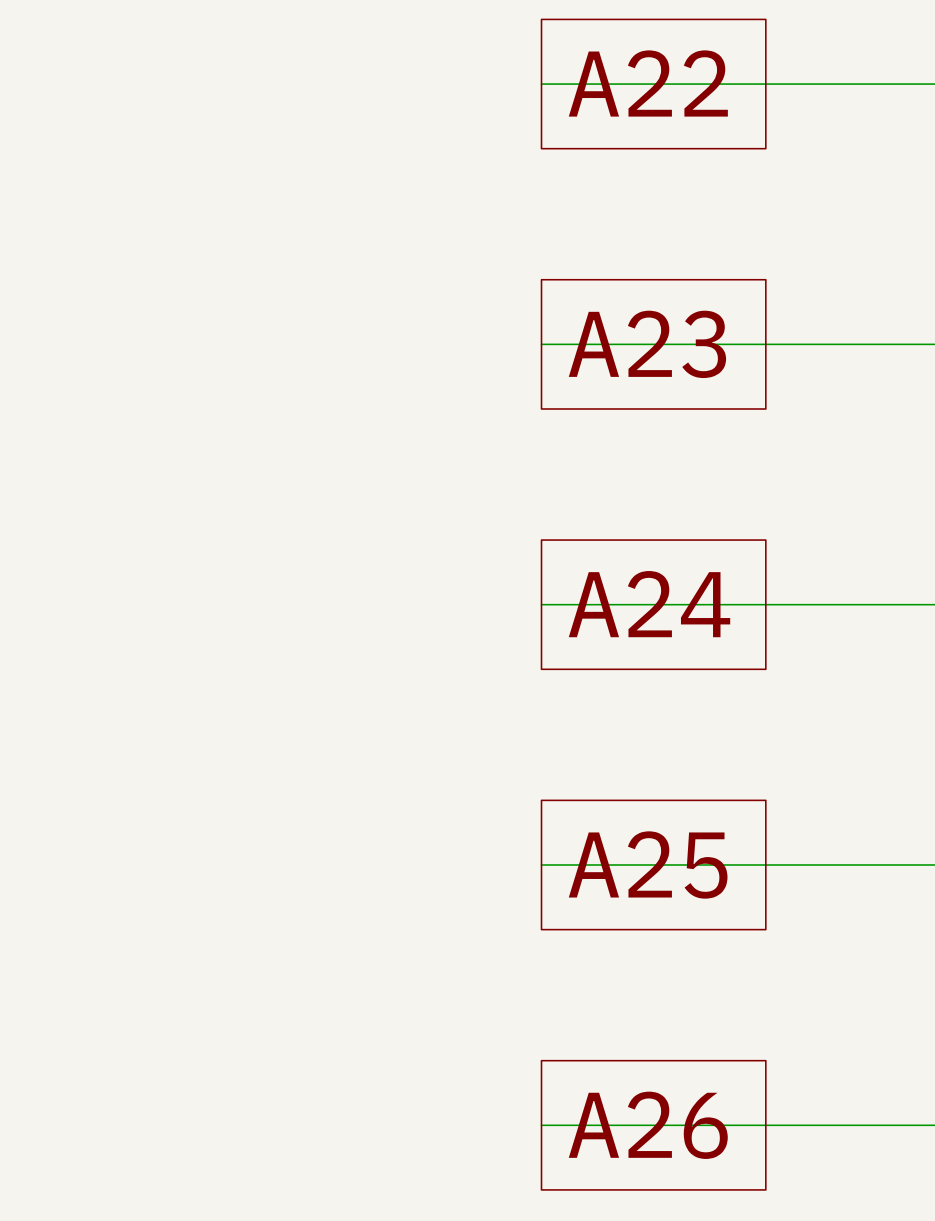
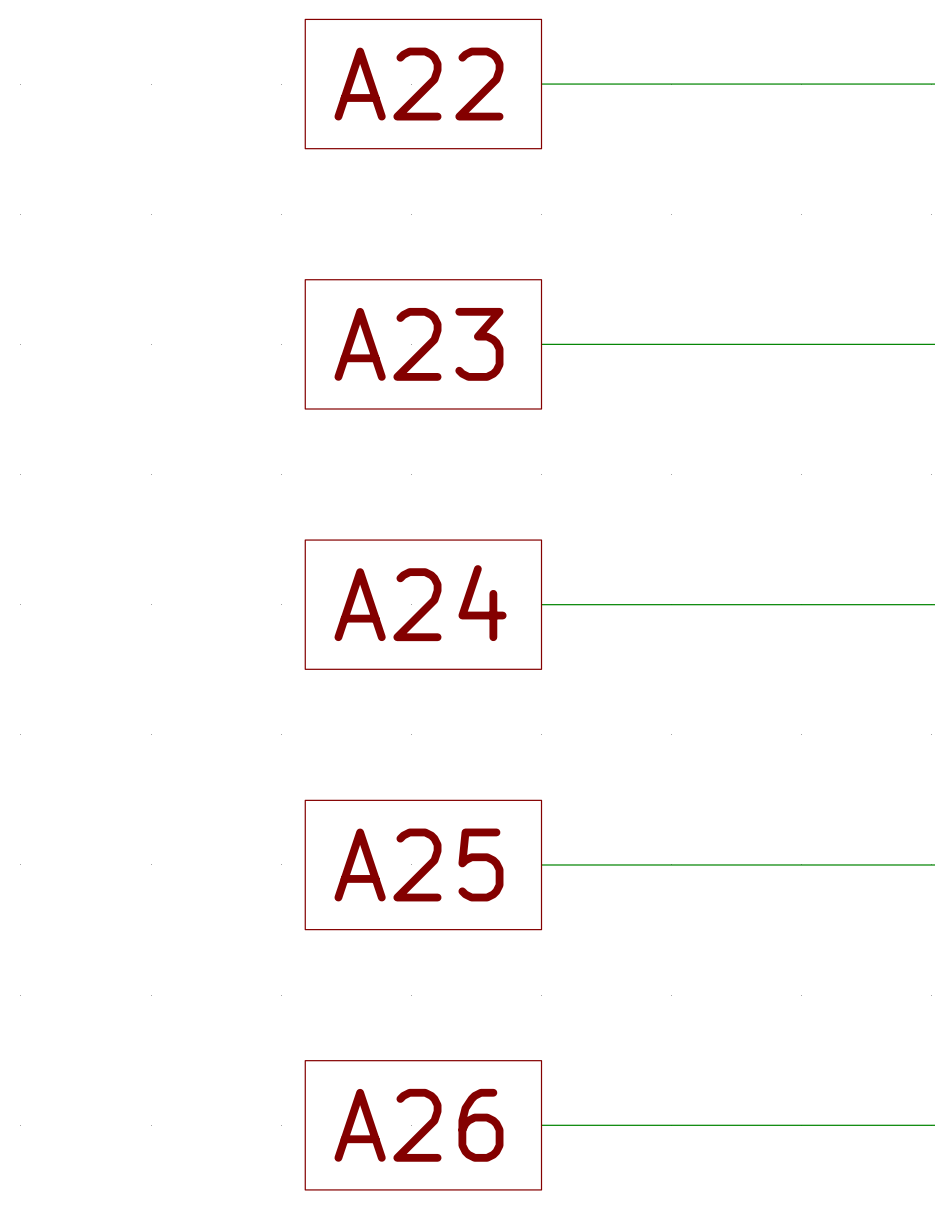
global label rotation: 0° (648, 83) -> 180° (418, 84)
global label rotation: 0° (647, 344) -> 180° (418, 344)
global label rotation: 0° (649, 604) -> 180° (420, 603)
global label rotation: 0° (648, 864) -> 180° (418, 864)
global label rotation: 0° (648, 1125) -> 180° (418, 1125)

